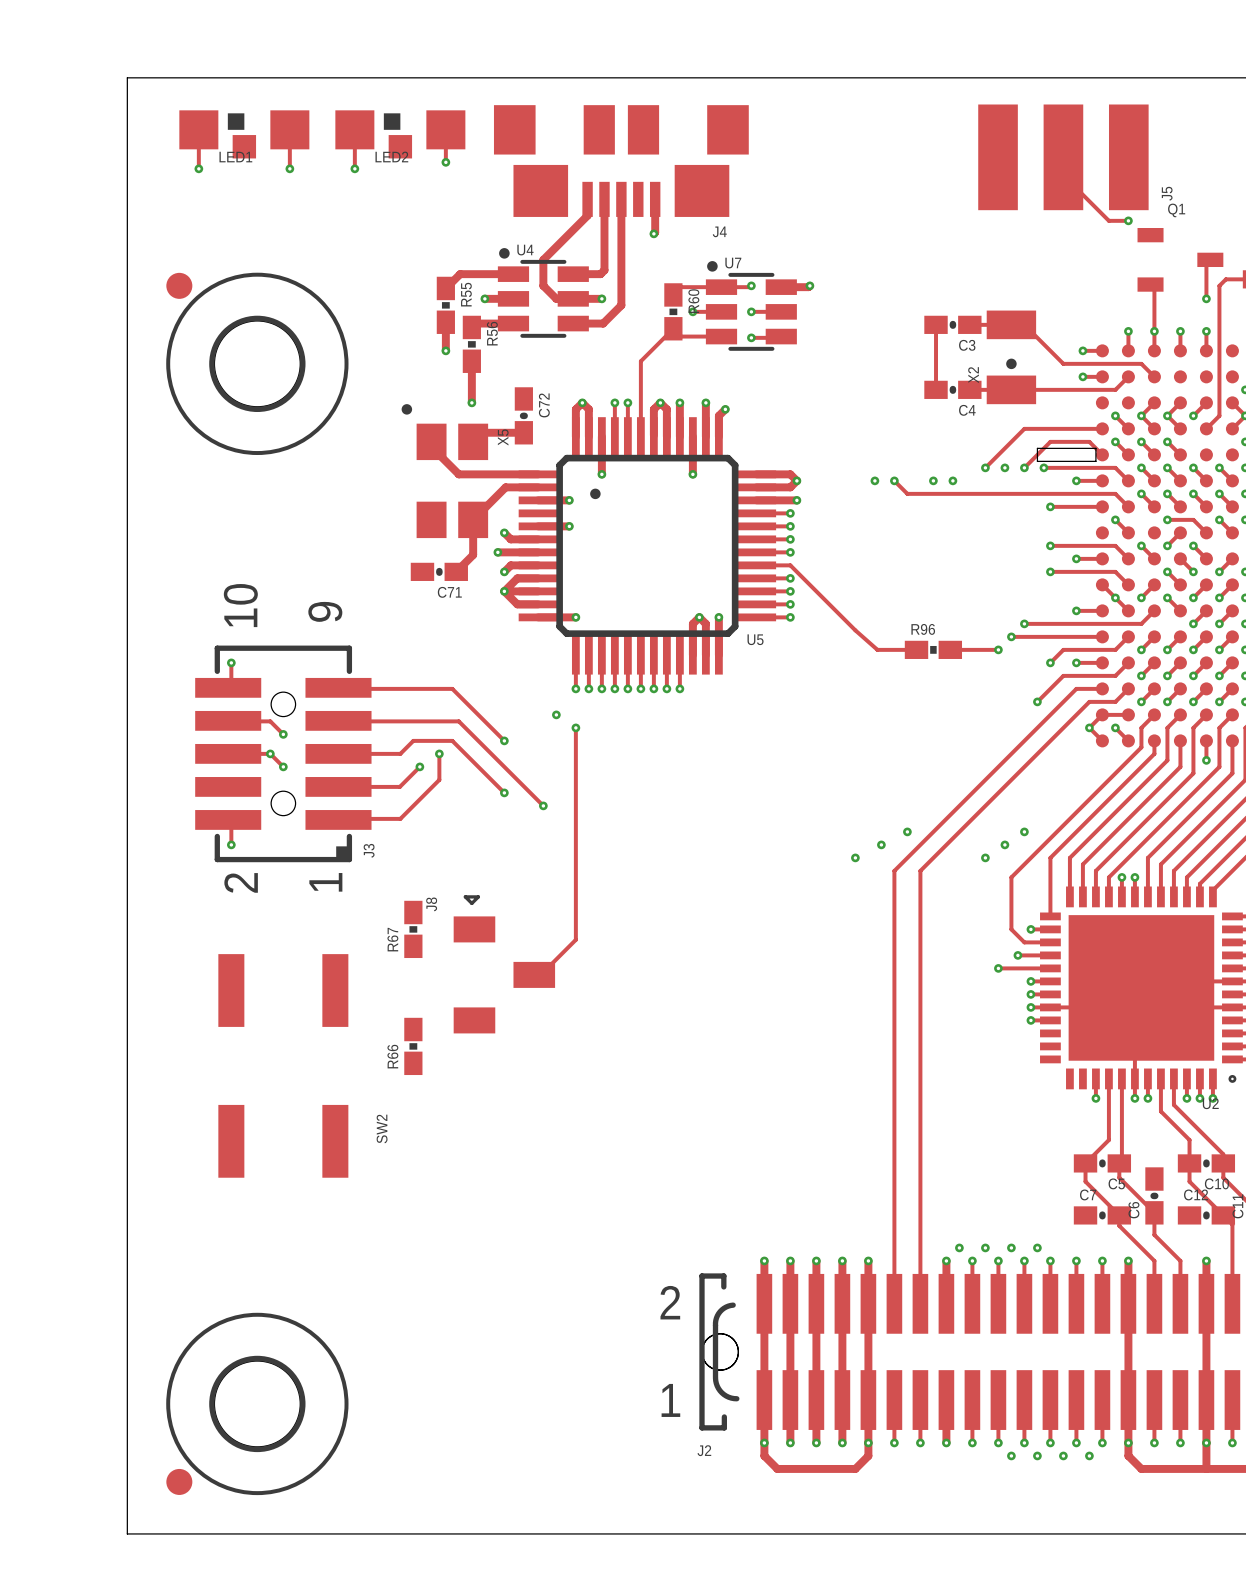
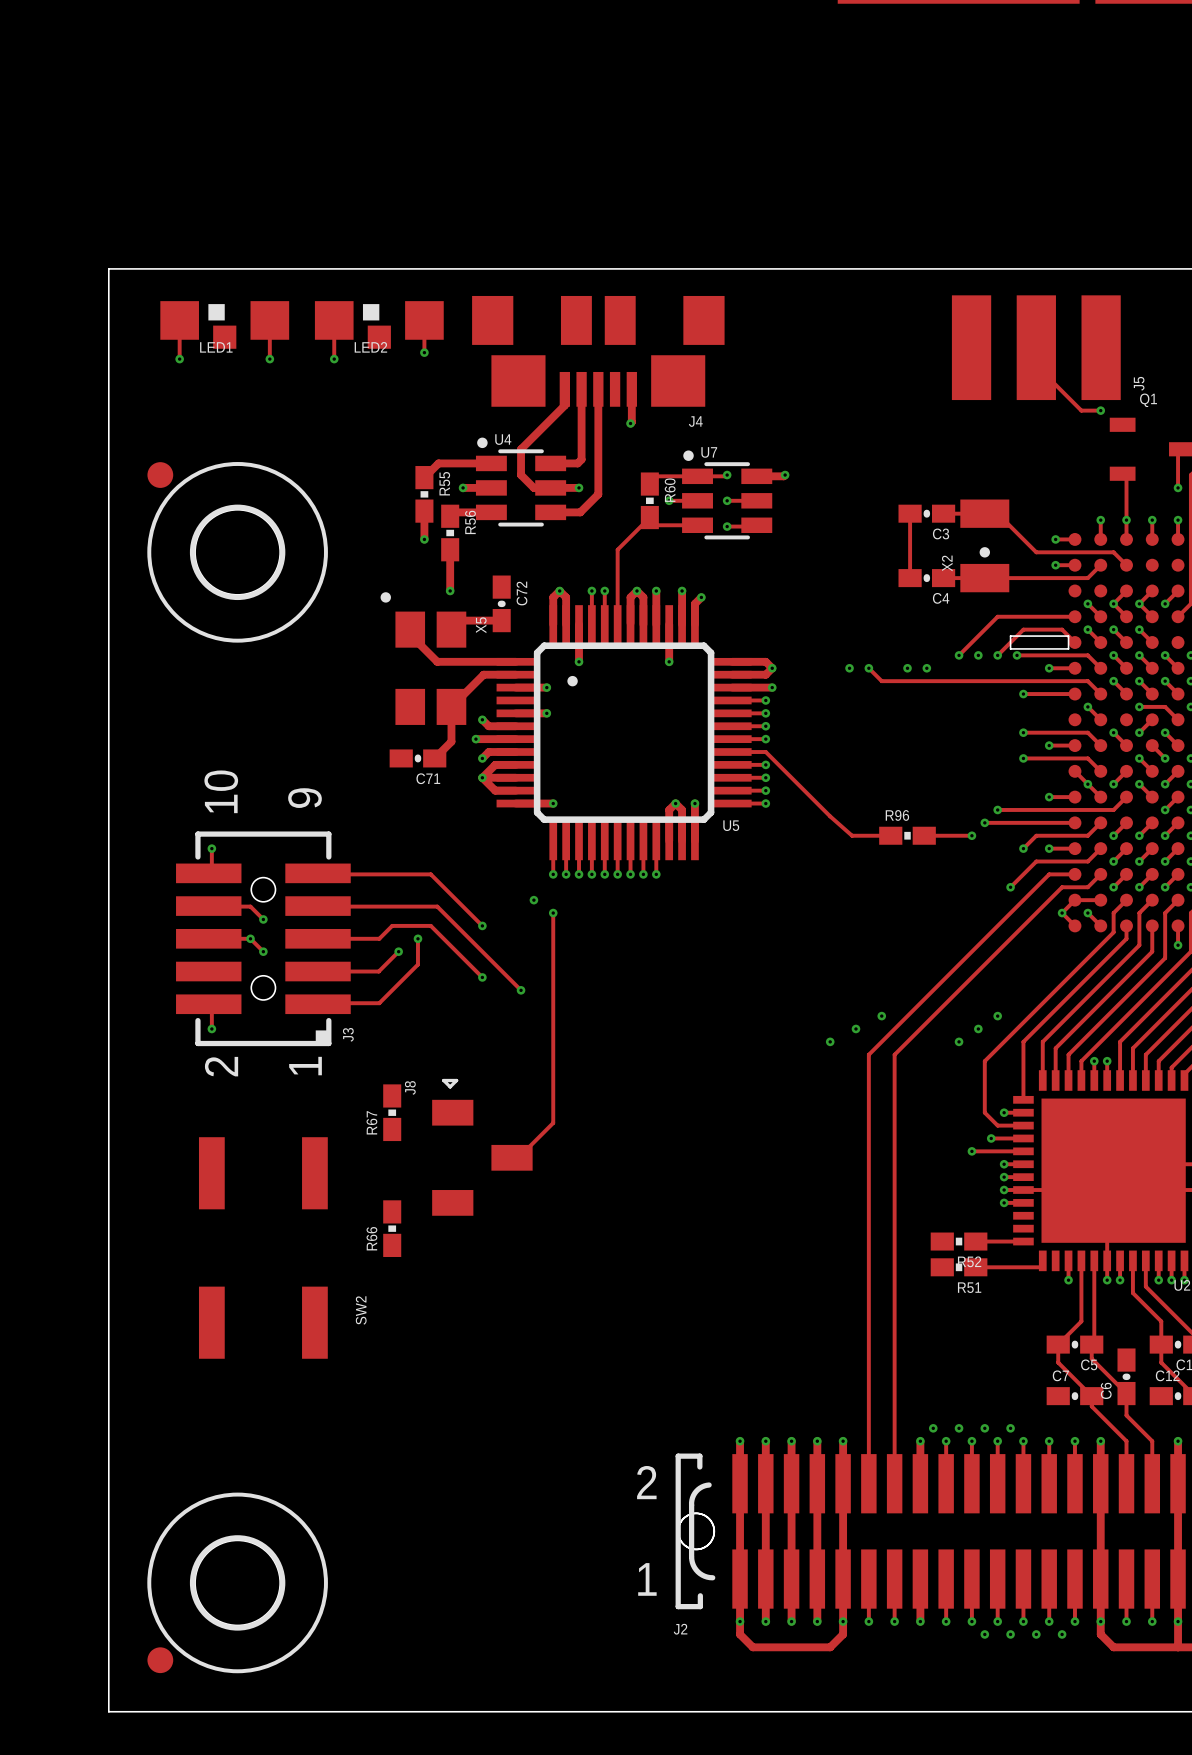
R52: none -> (959, 1241)
track: none -> (975, 1241) (1023, 1241)
R51: none -> (959, 1267)
track: none -> (975, 1267) (1042, 1267)

